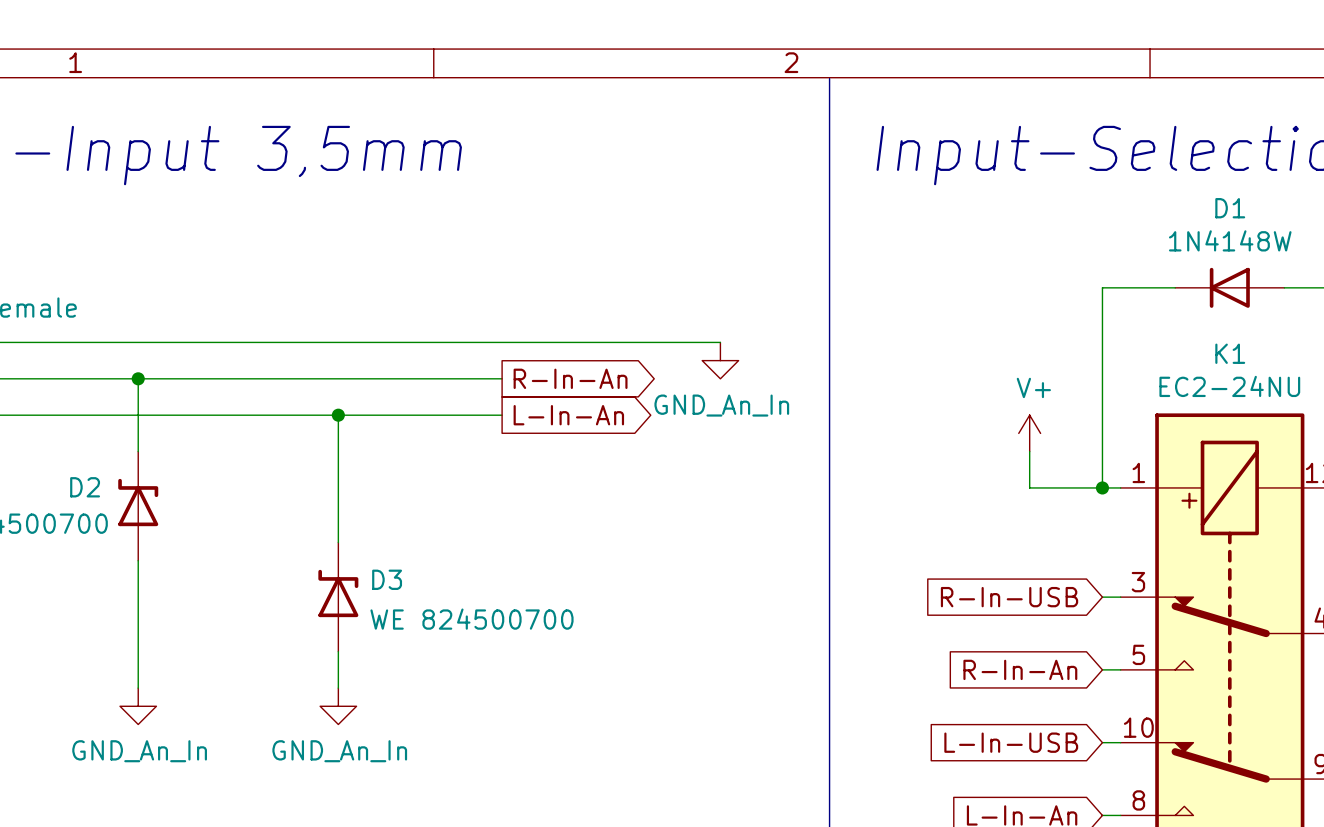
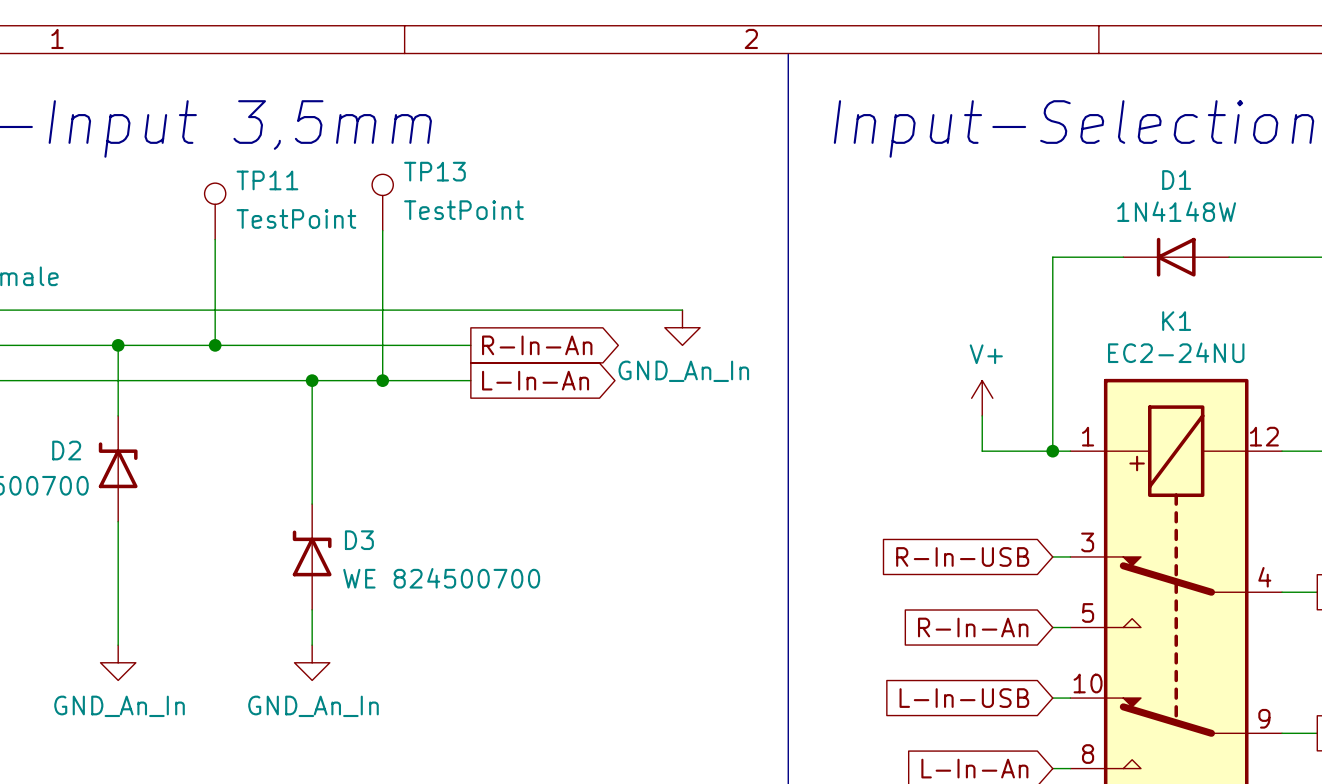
TP13: none -> TestPoint (382, 202)
TP11: none -> TestPoint (215, 211)
wire: none -> (382, 230) (382, 380)
wire: none -> (215, 239) (215, 345)
junction: none -> (215, 345)
junction: none -> (382, 380)

